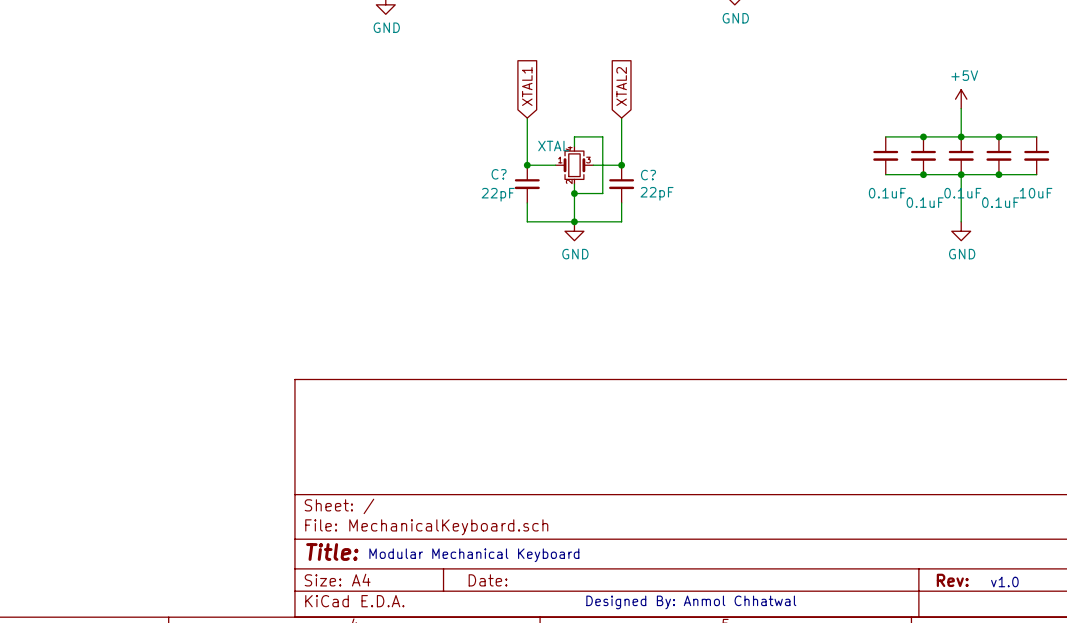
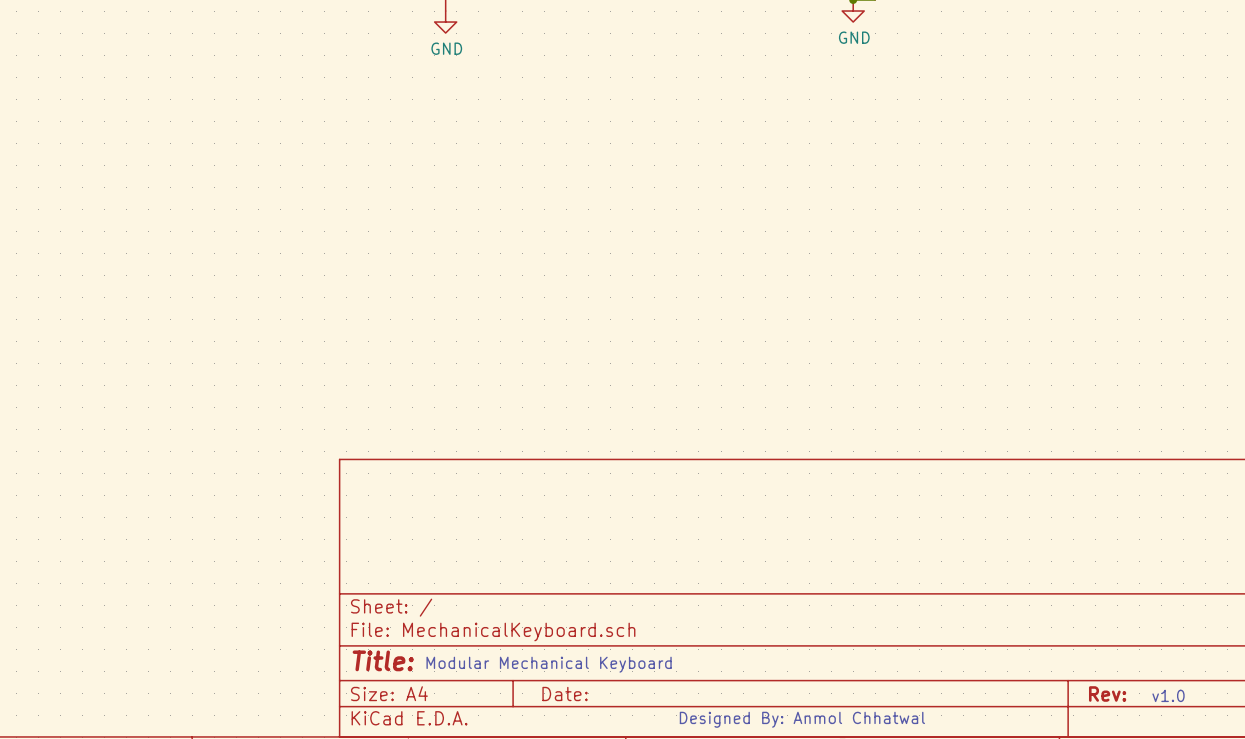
global label: XTAL1 (527, 86) -> none
global label: XTAL2 (621, 86) -> none
power symbol: +5V (961, 99) -> none
wire: (961, 108) (961, 136) -> none
wire: (527, 118) (527, 165) (555, 165) -> none
wire: (621, 118) (621, 165) (593, 165) -> none
wire: (885, 136) (1036, 136) -> none
junction: (923, 136) -> none
junction: (961, 136) -> none
junction: (998, 136) -> none
wire: (574, 146) (574, 136) (602, 136) (602, 193) (574, 193) -> none
part: 0.1uF (885, 155) -> none
part: 0.1uF (923, 155) -> none
part: 0.1uF (961, 155) -> none
part: 0.1uF (998, 155) -> none
part: 10uF (1036, 155) -> none
junction: (527, 165) -> none
XTAL: (574, 165) -> none
junction: (621, 165) -> none
wire: (885, 174) (1036, 174) -> none
junction: (923, 174) -> none
wire: (961, 174) (961, 221) -> none
junction: (961, 174) -> none
junction: (998, 174) -> none
C?: 22pF (527, 184) -> none
wire: (574, 184) (574, 221) -> none
C?: 22pF (621, 184) -> none
junction: (574, 193) -> none
wire: (527, 202) (527, 221) (621, 221) (621, 202) -> none
junction: (574, 221) -> none
power symbol: GND (574, 231) -> none
power symbol: GND (961, 231) -> none

